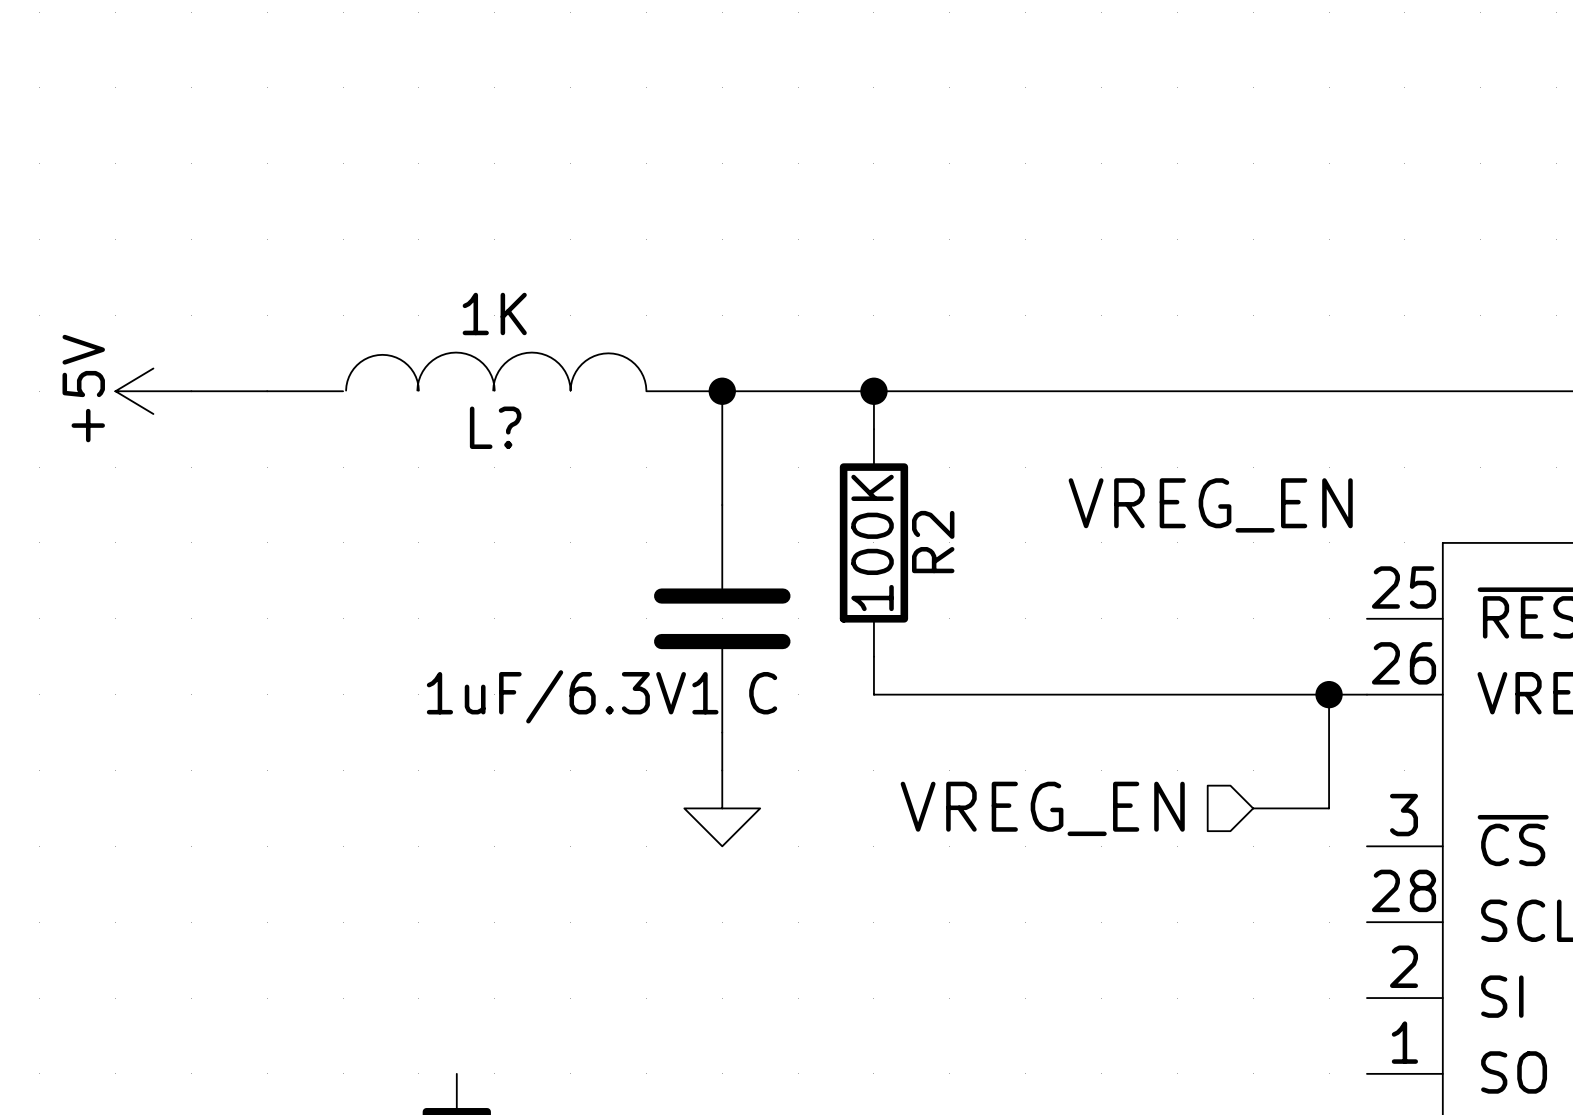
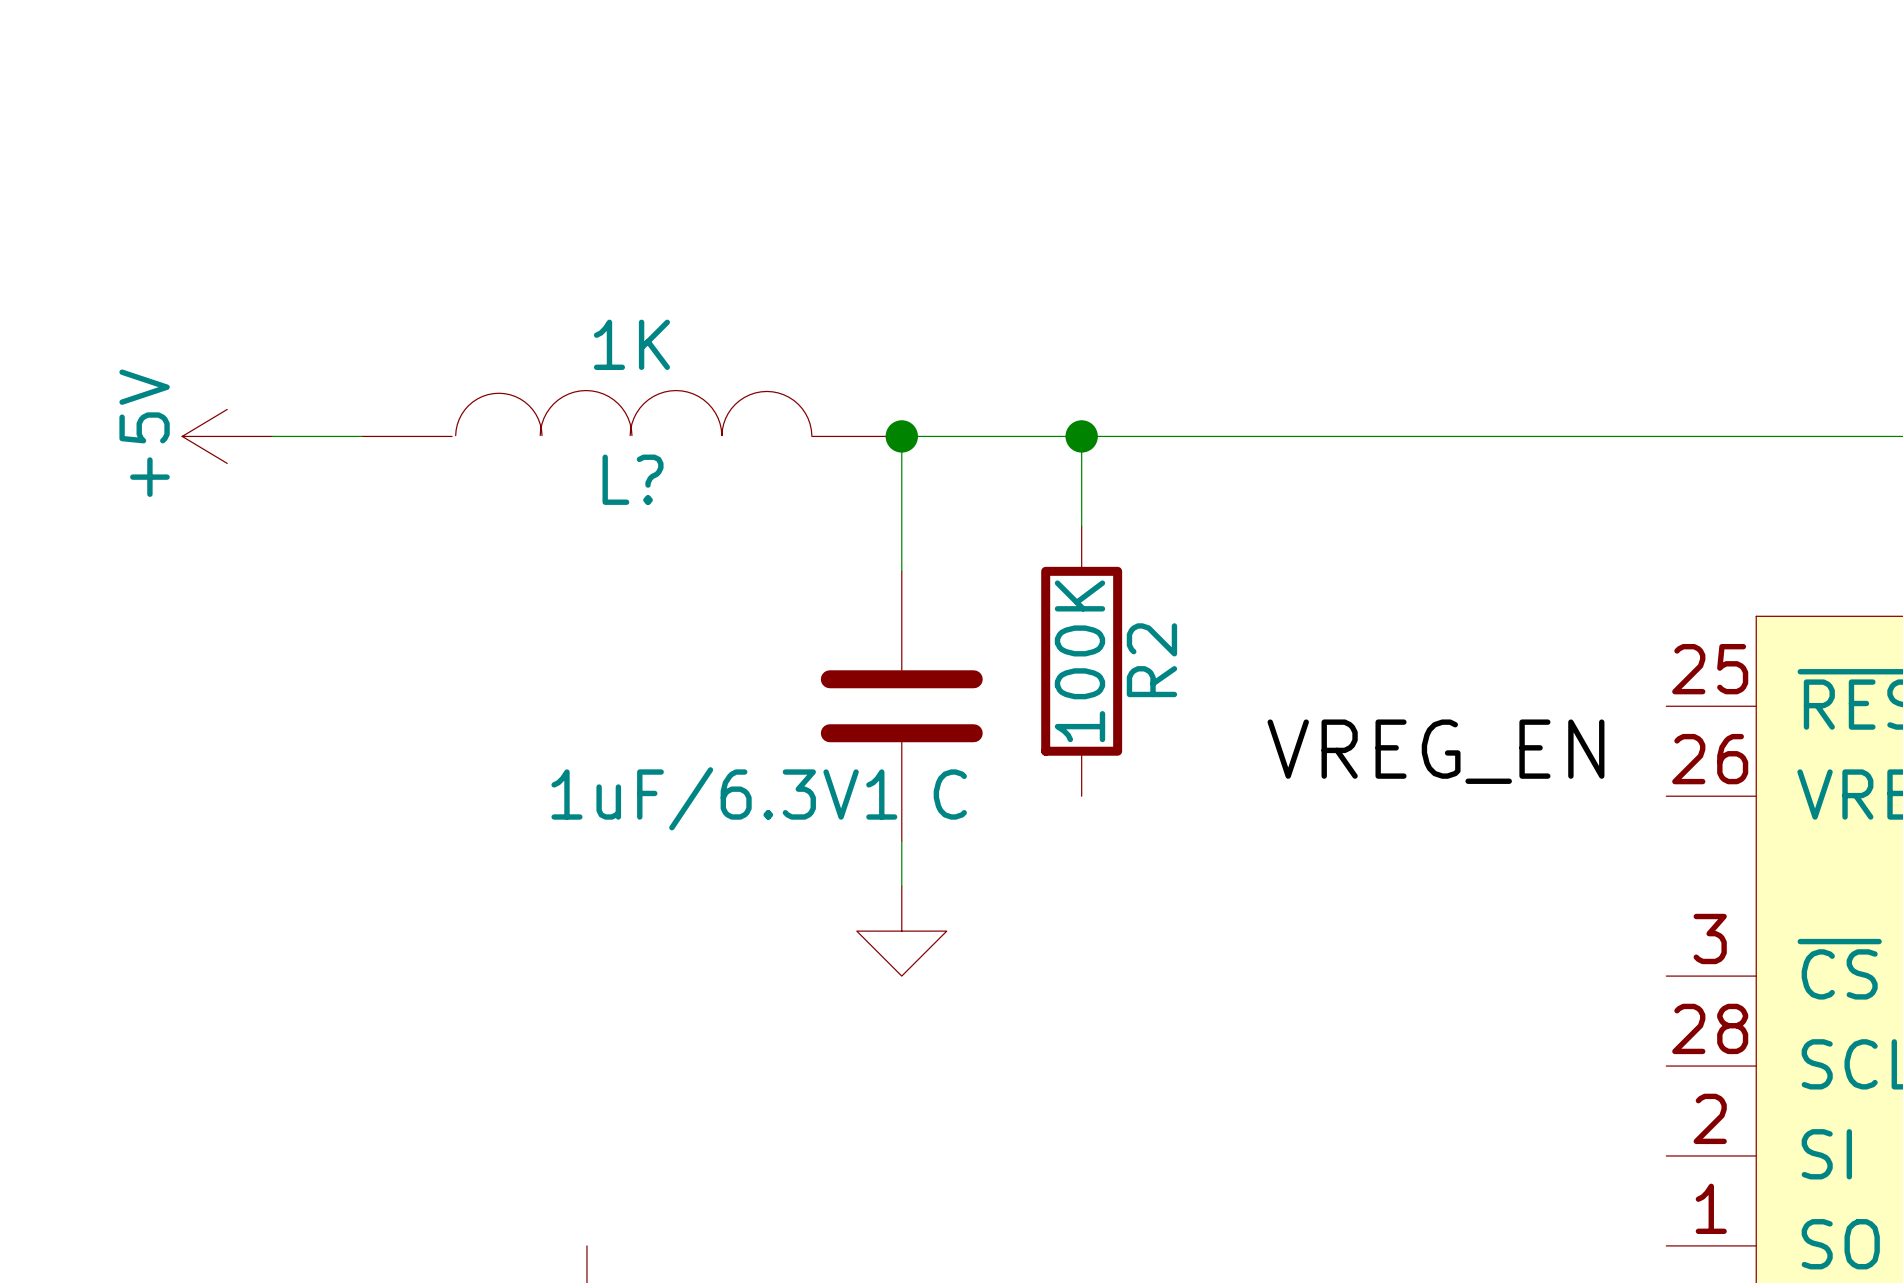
label position: VREG_EN (1210, 505) -> VREG_EN (1436, 751)
R2 position: (873, 542) -> (1081, 661)
wire: (873, 656) (873, 694) (1366, 694) -> none
wire: (1329, 694) (1329, 808) (1253, 808) -> none
junction: (1329, 694) -> none
hierarchical label: VREG_EN (1042, 808) -> none

